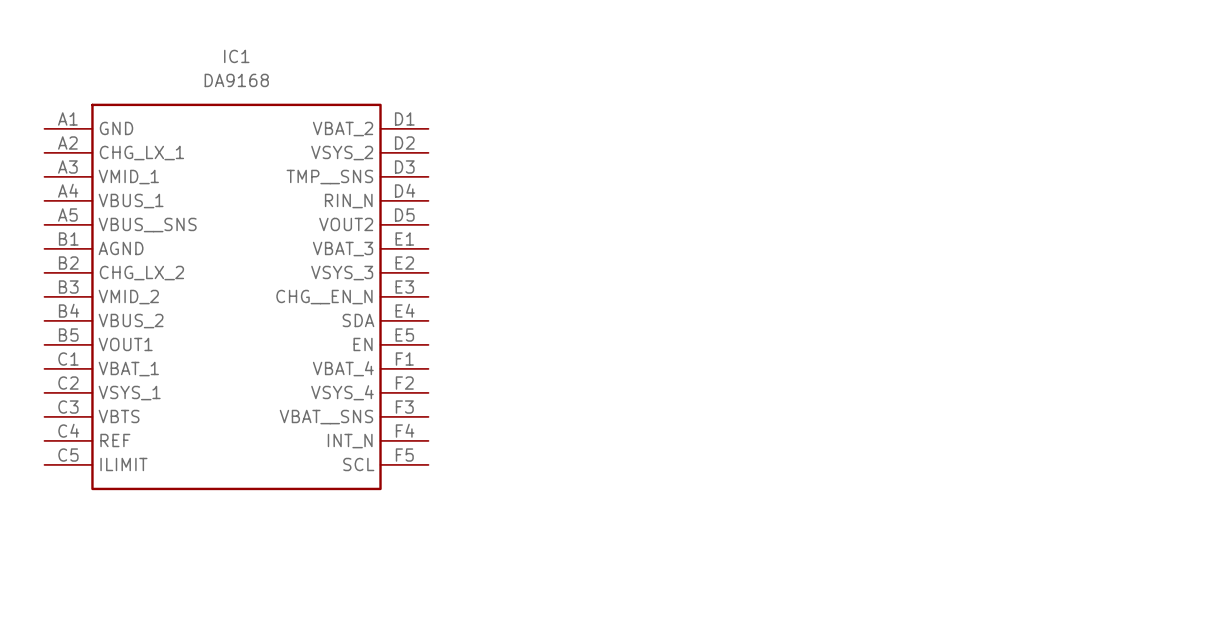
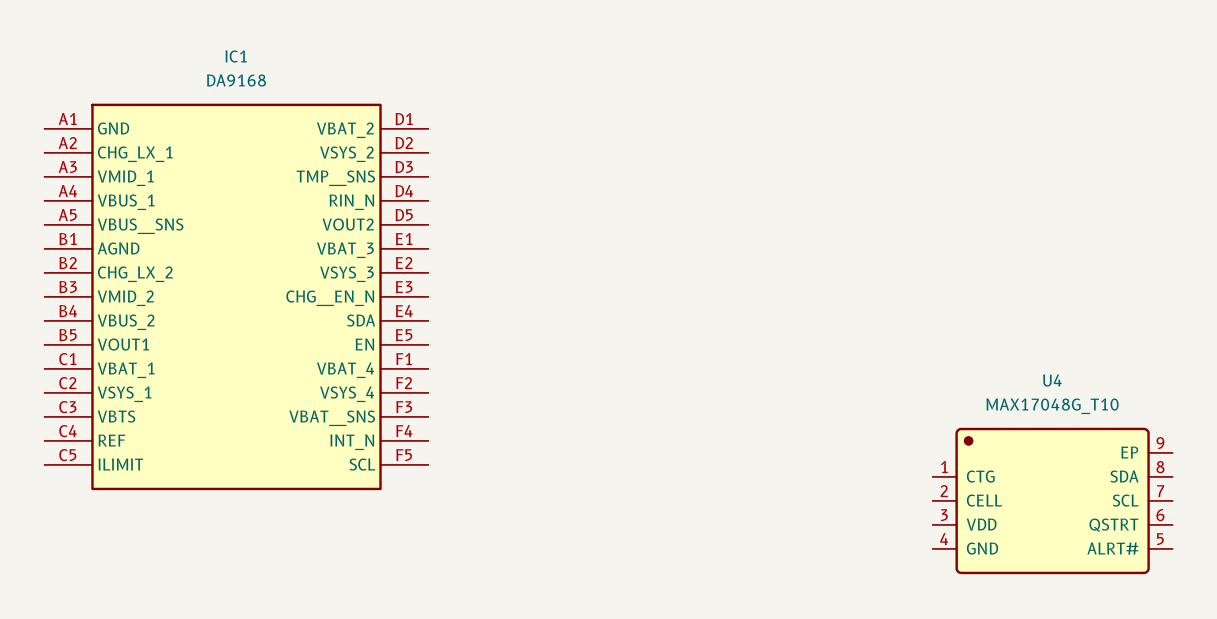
U4: none -> MAX17048G_T10 (1052, 500)

